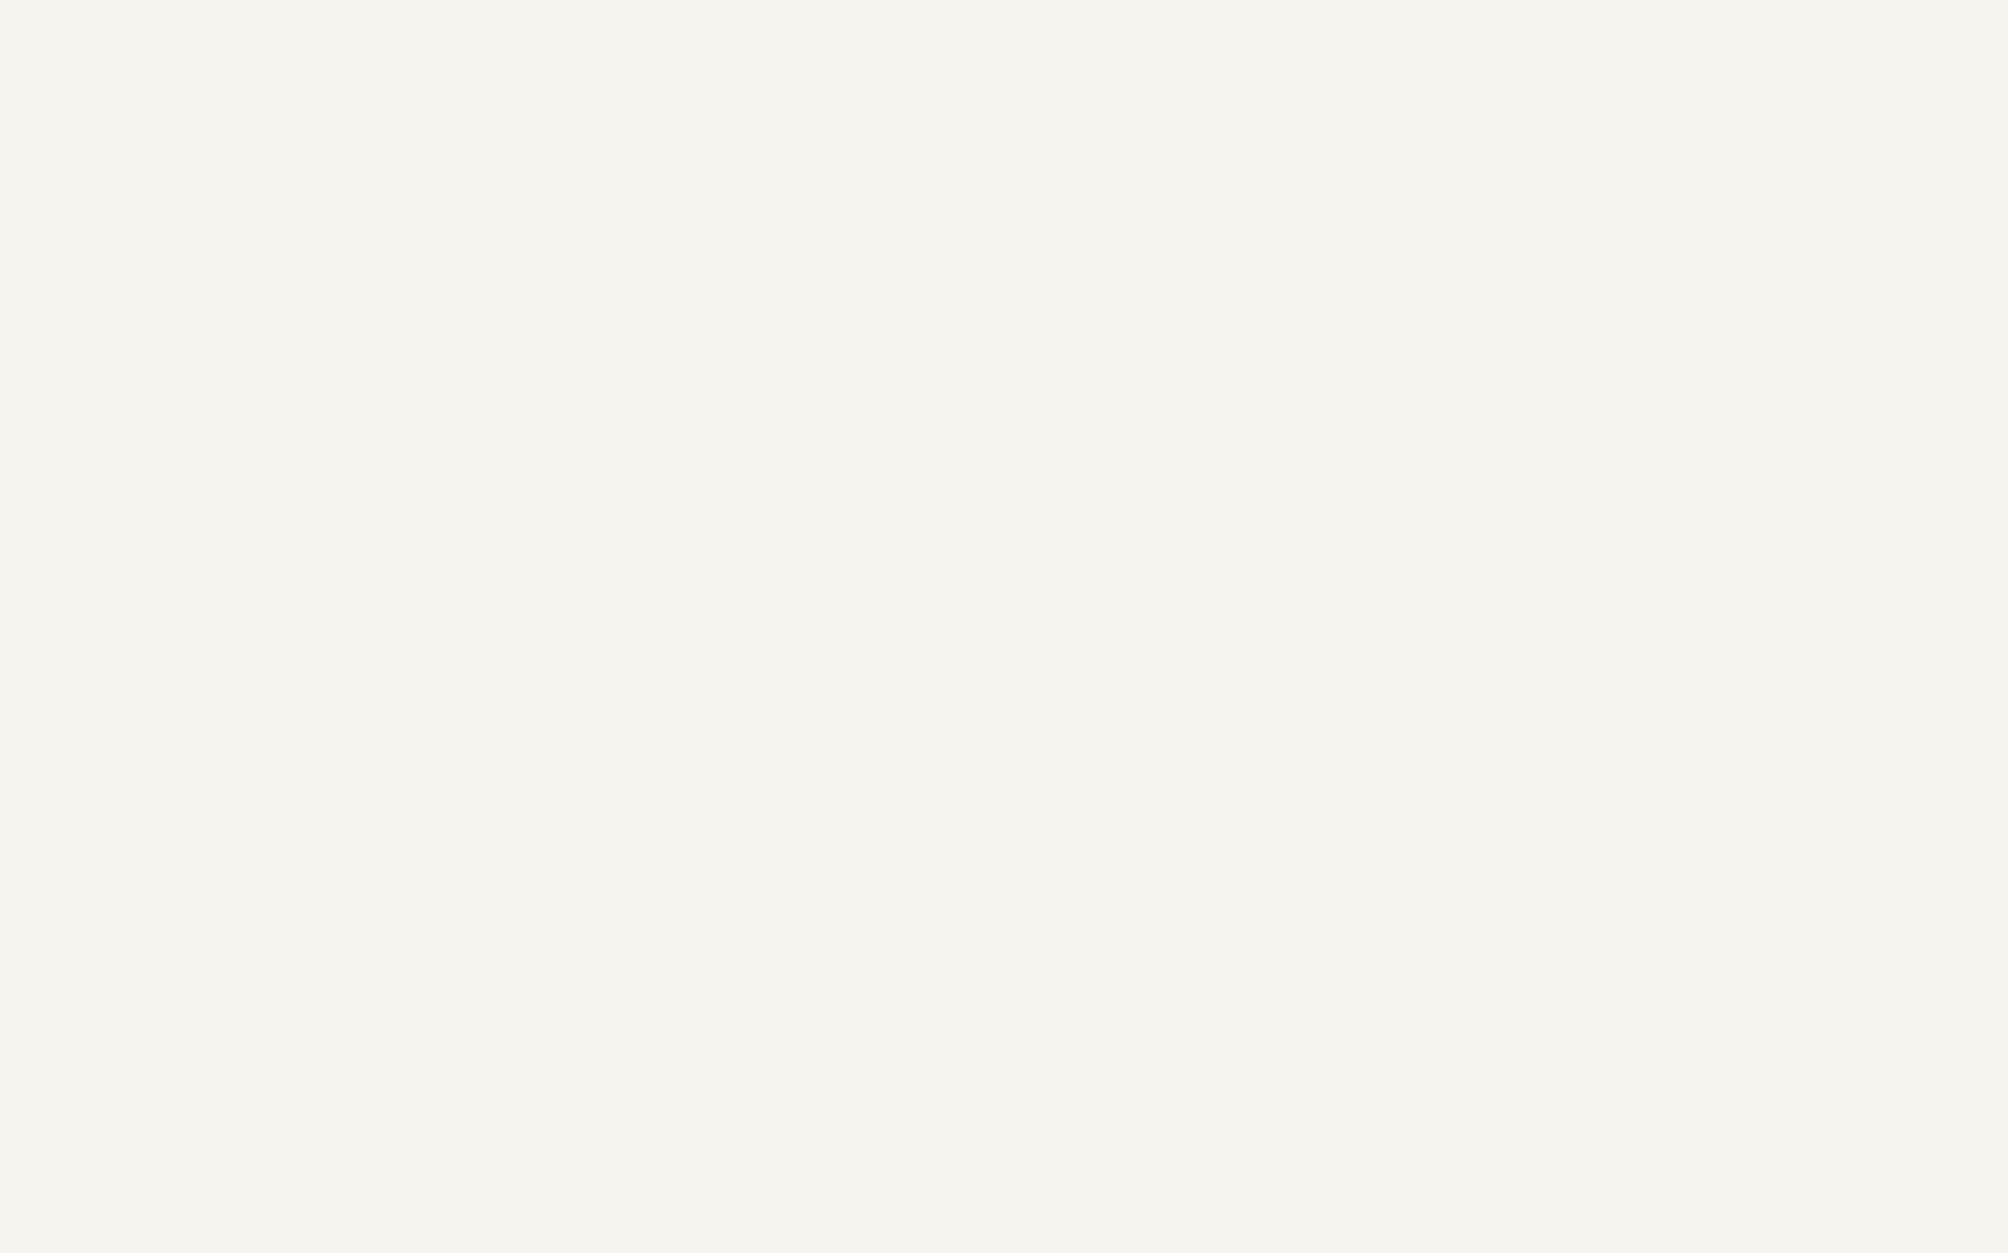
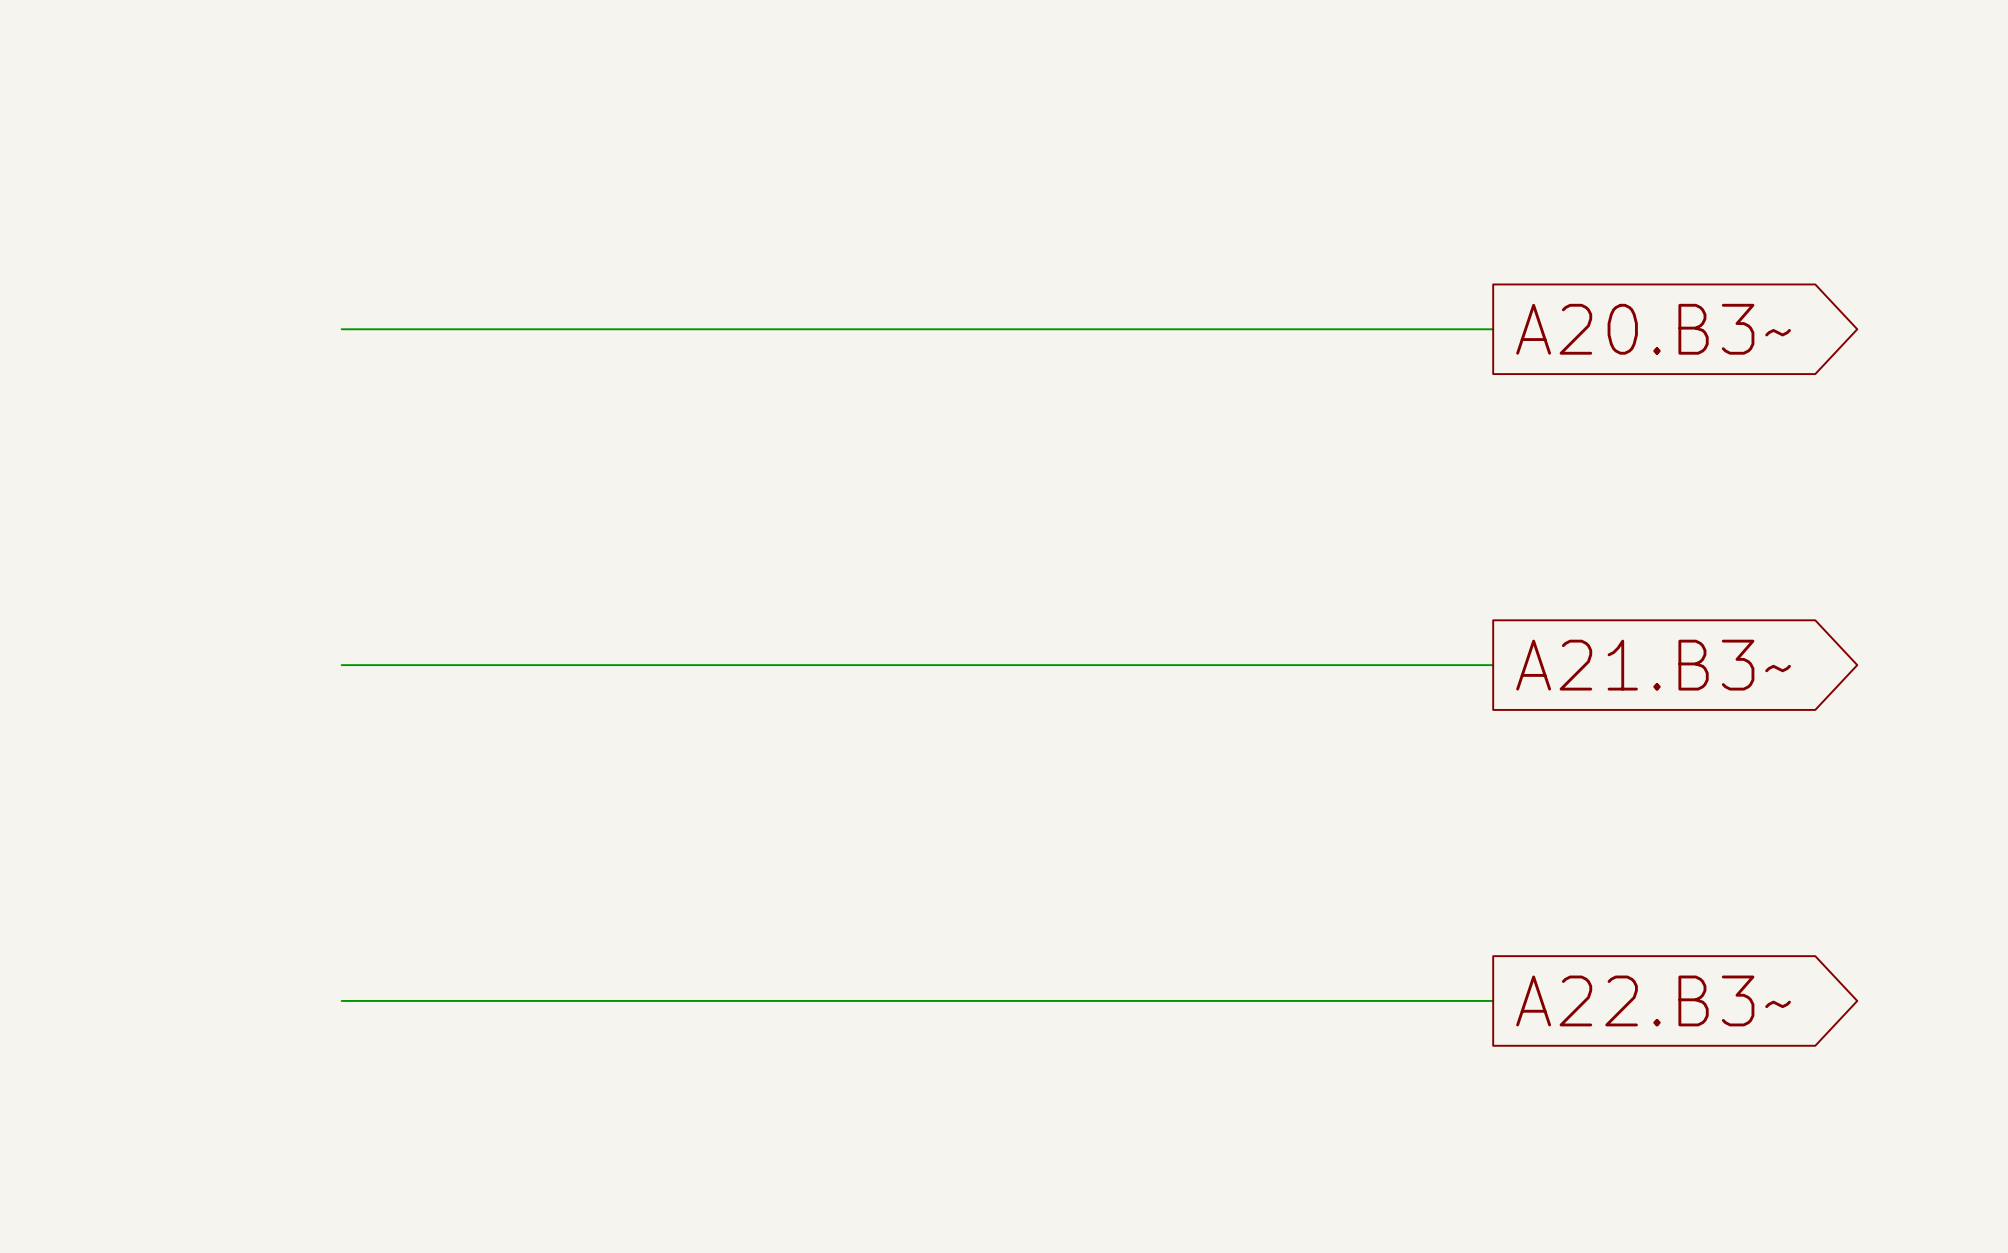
wire: none -> (341, 329) (1493, 329)
global label: none -> A20.B3~ (1653, 329)
wire: none -> (341, 665) (1493, 665)
global label: none -> A21.B3~ (1653, 665)
wire: none -> (341, 1000) (1493, 1000)
global label: none -> A22.B3~ (1653, 1000)

